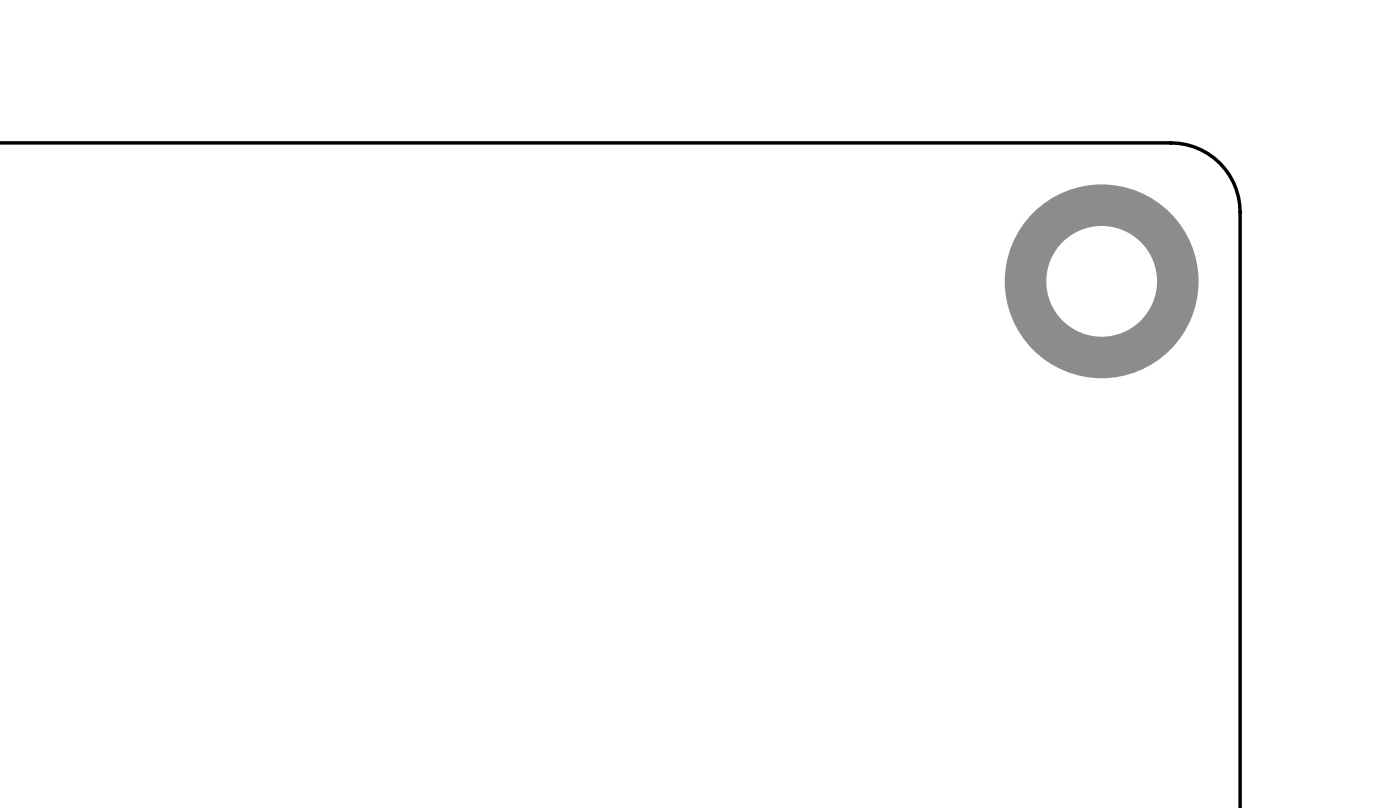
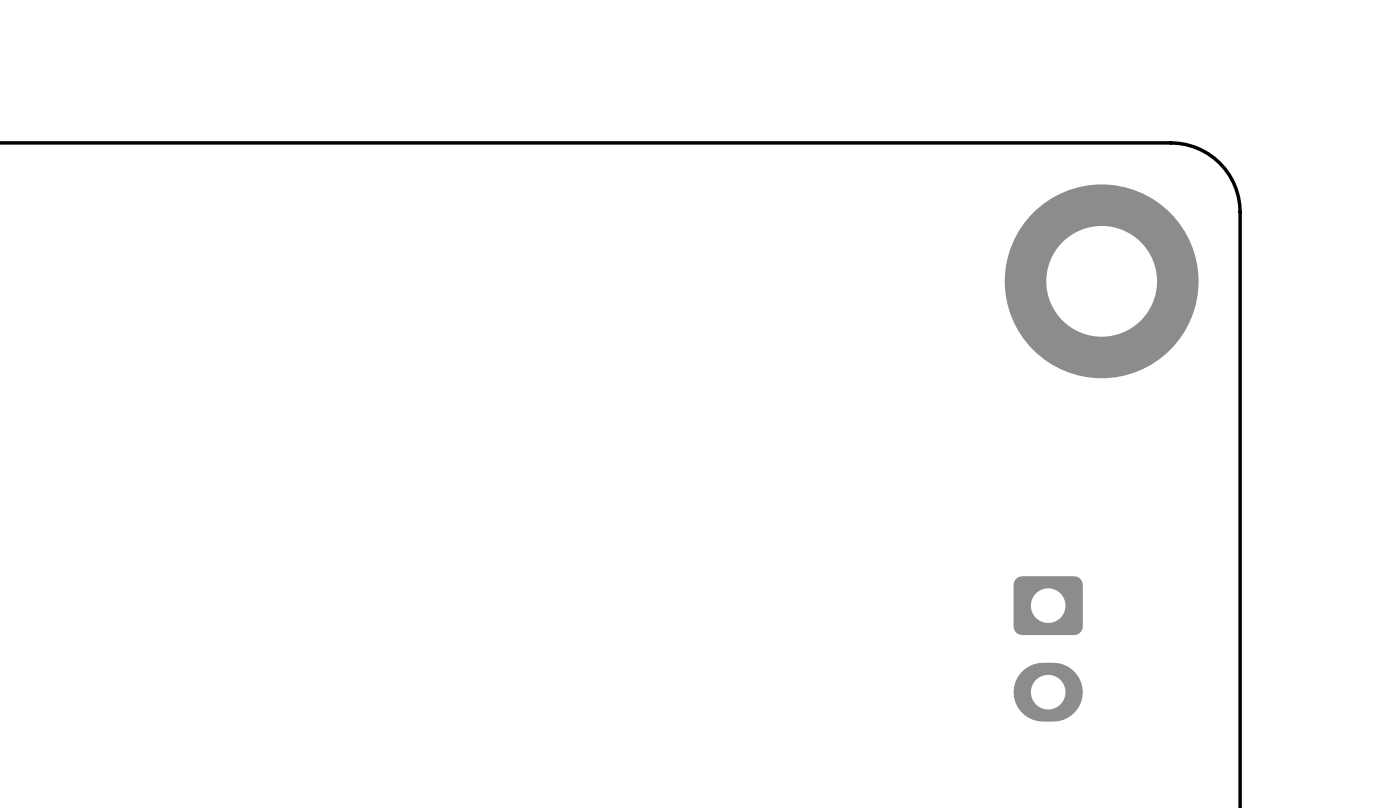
part: none -> (1048, 648)

